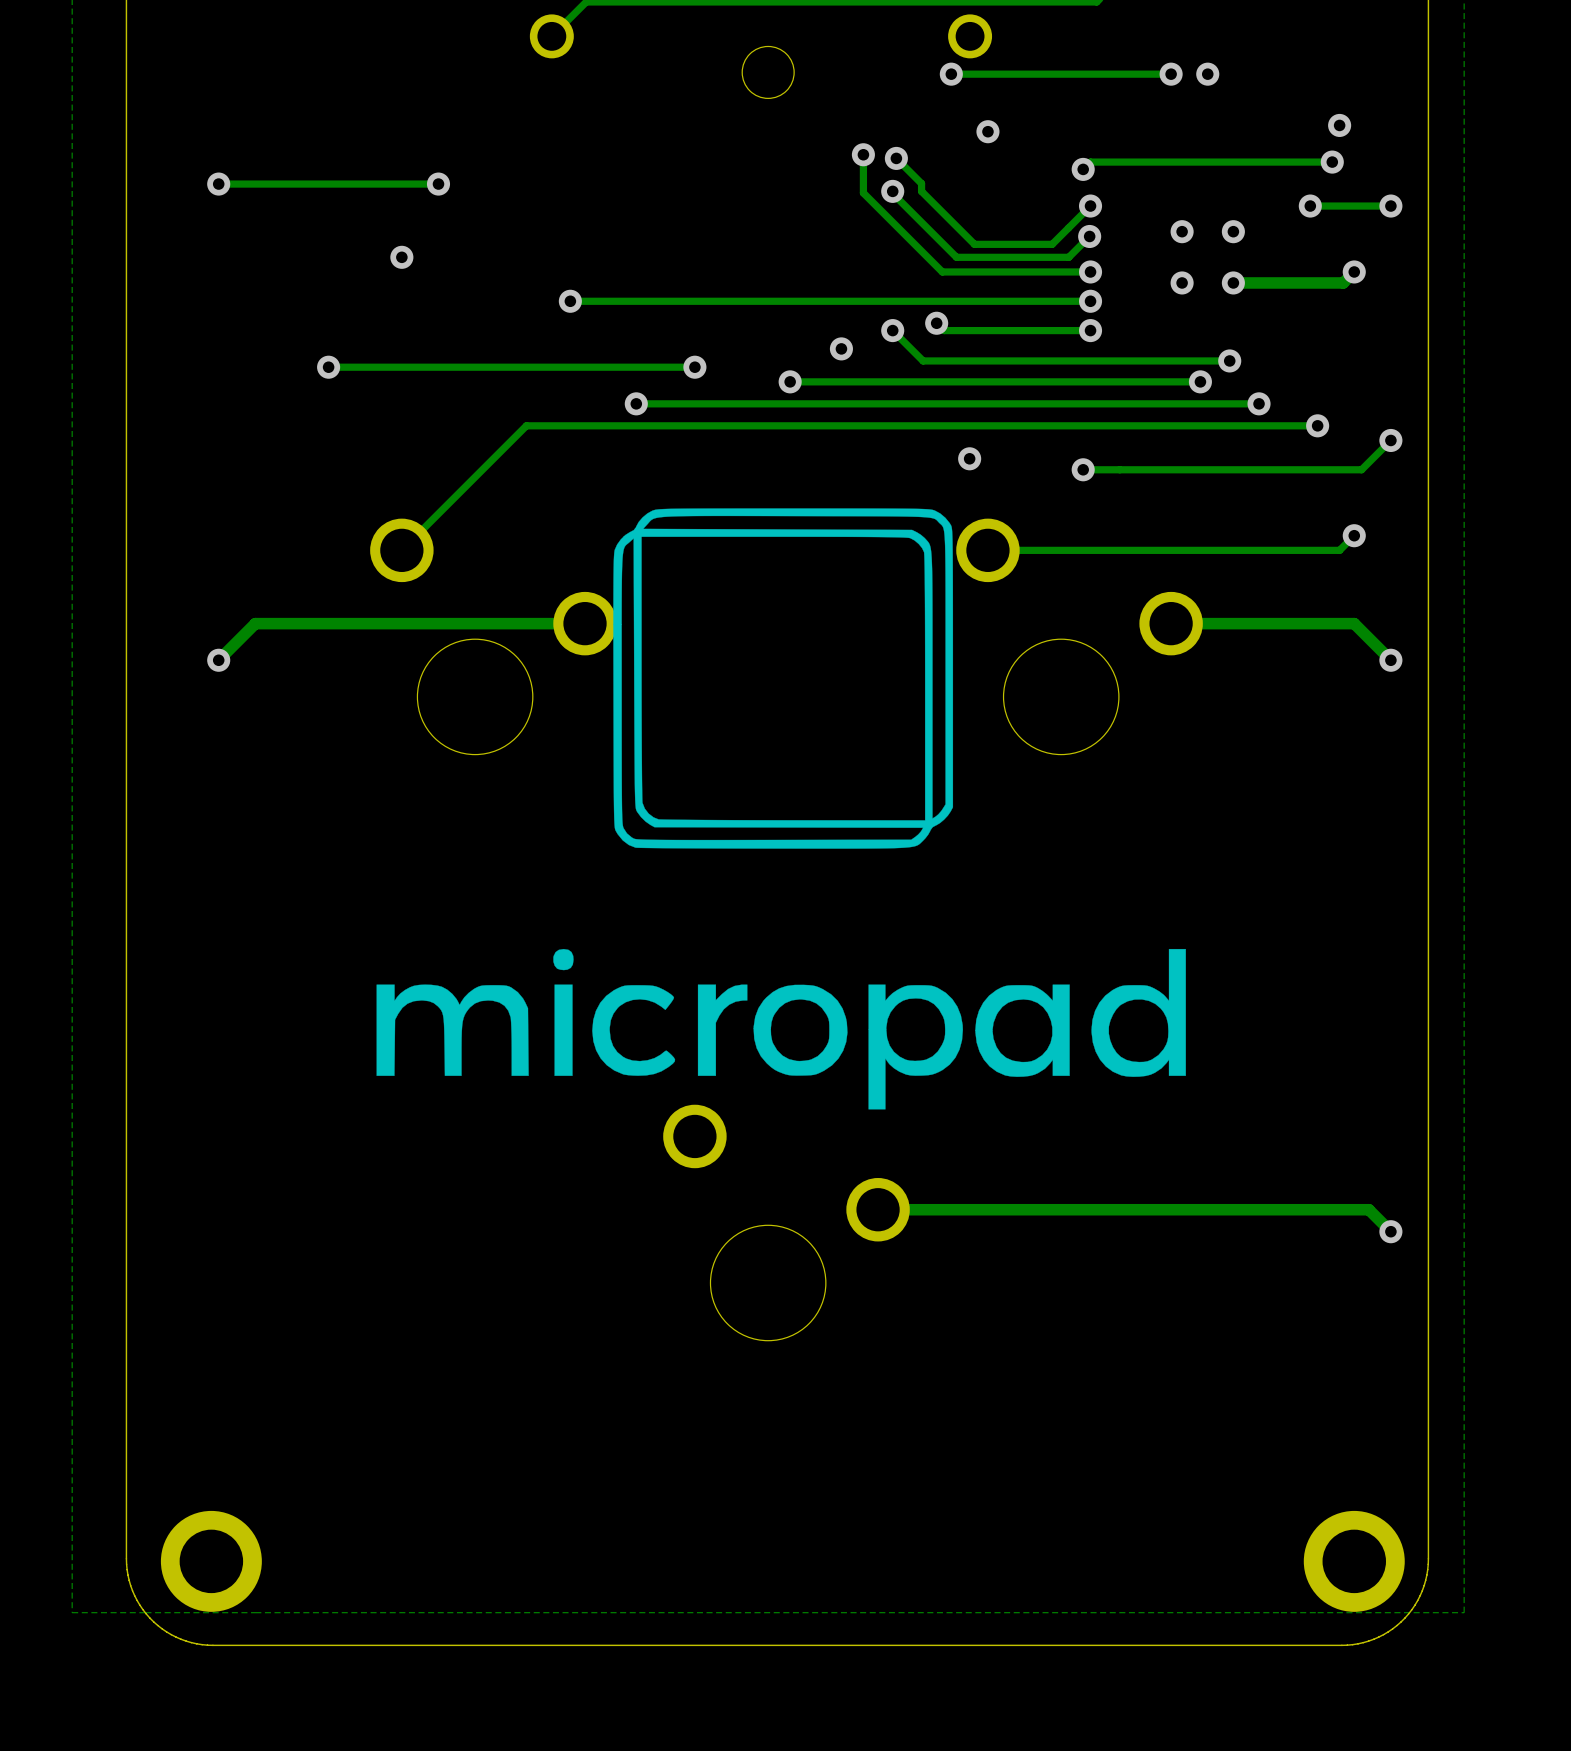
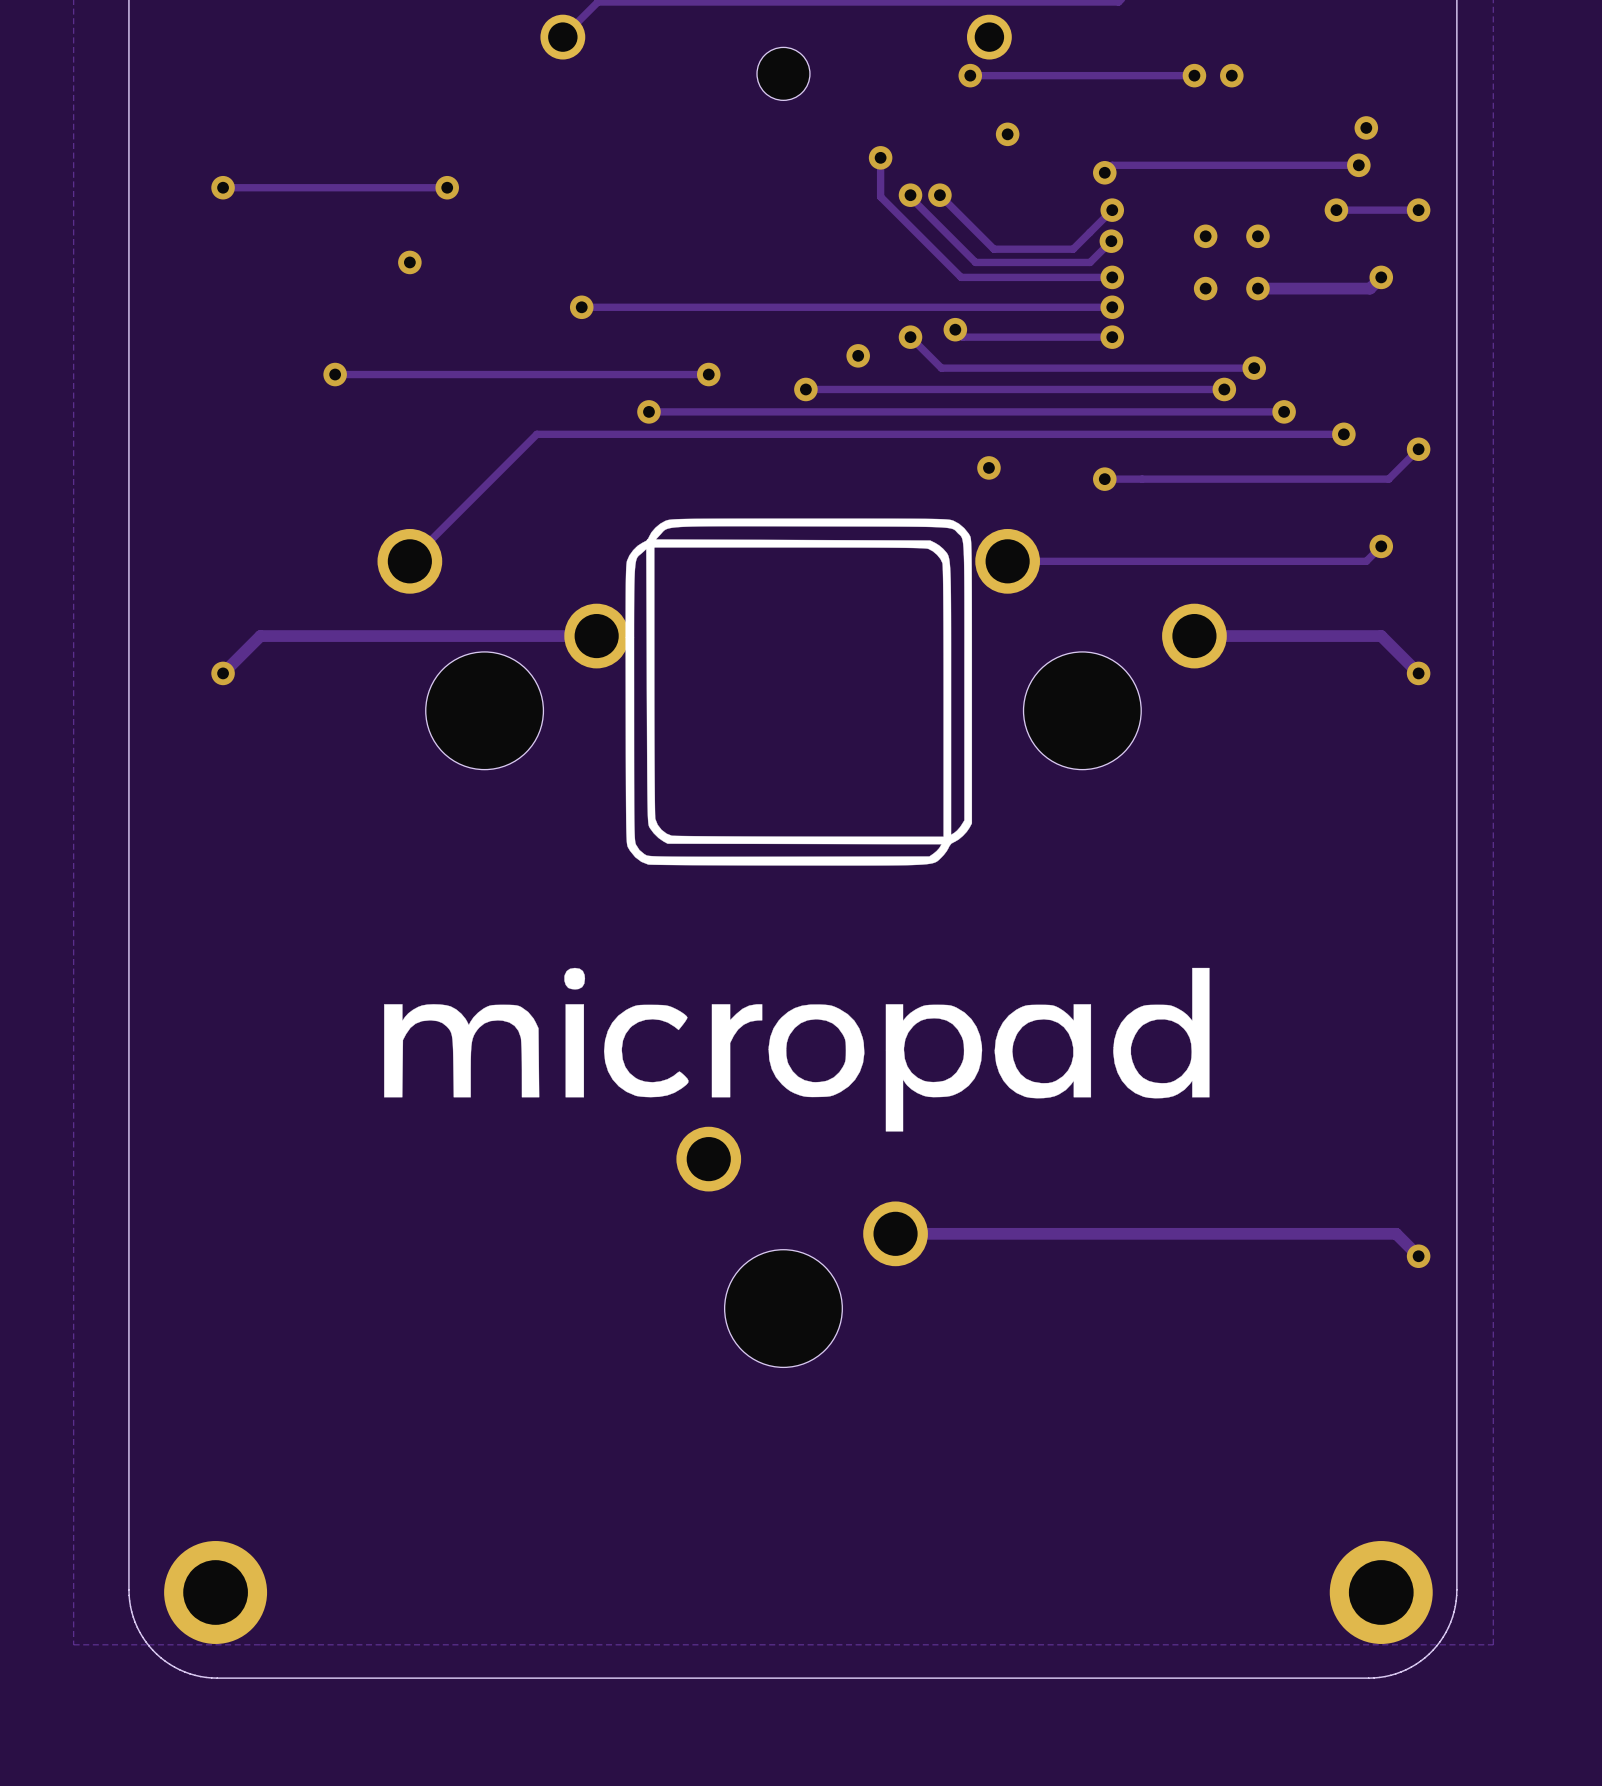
track: (896, 158) (921, 183) (921, 191) -> none
via position: (896, 158) -> (939, 195)

